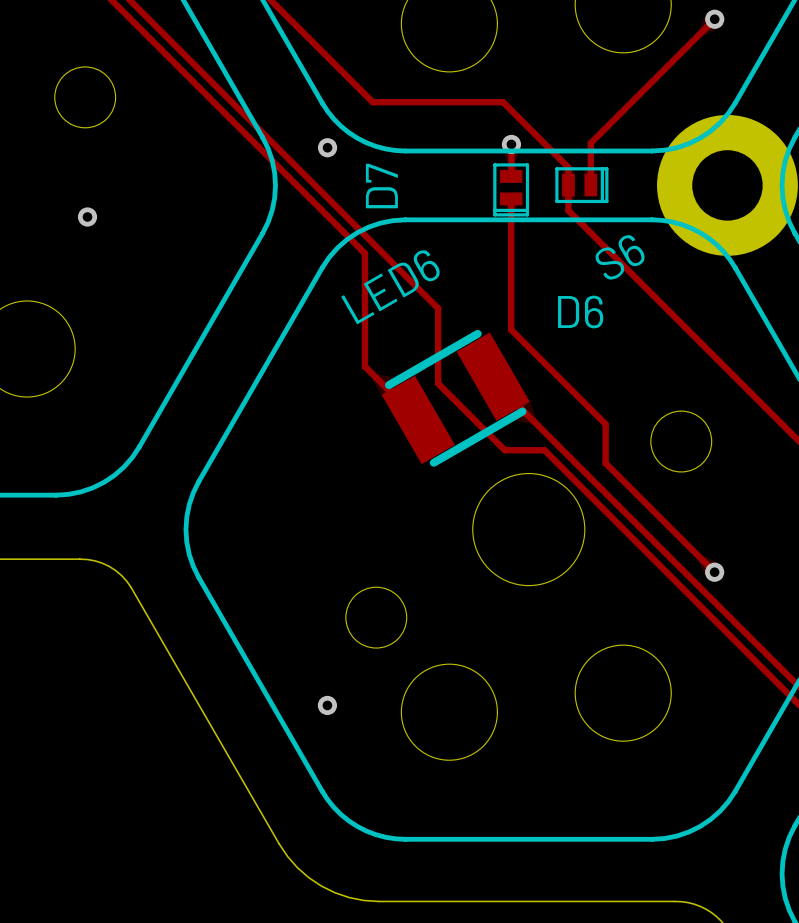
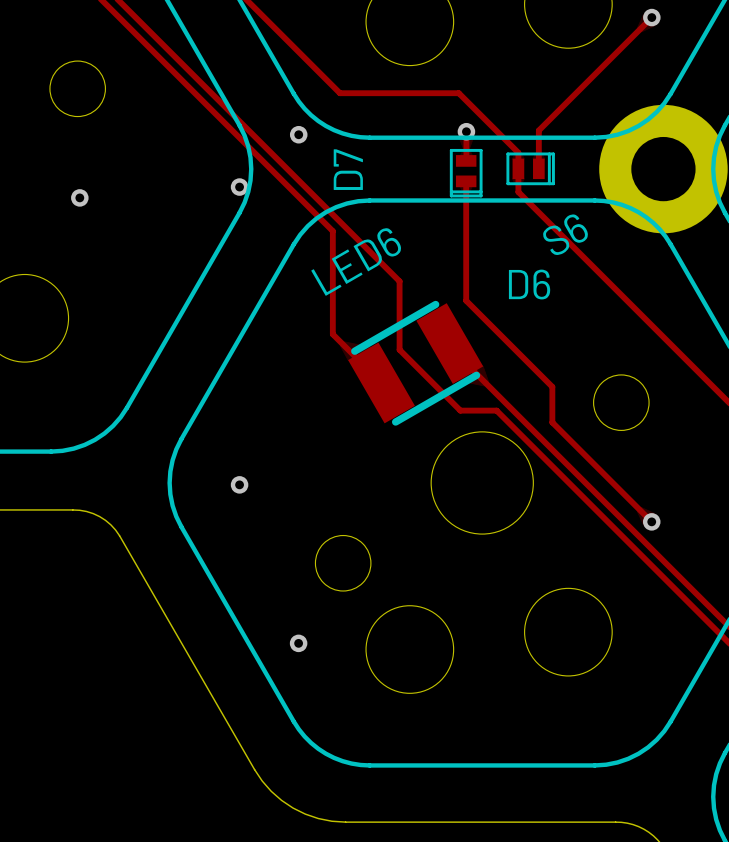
via: none -> (239, 187)
via: none -> (239, 484)

